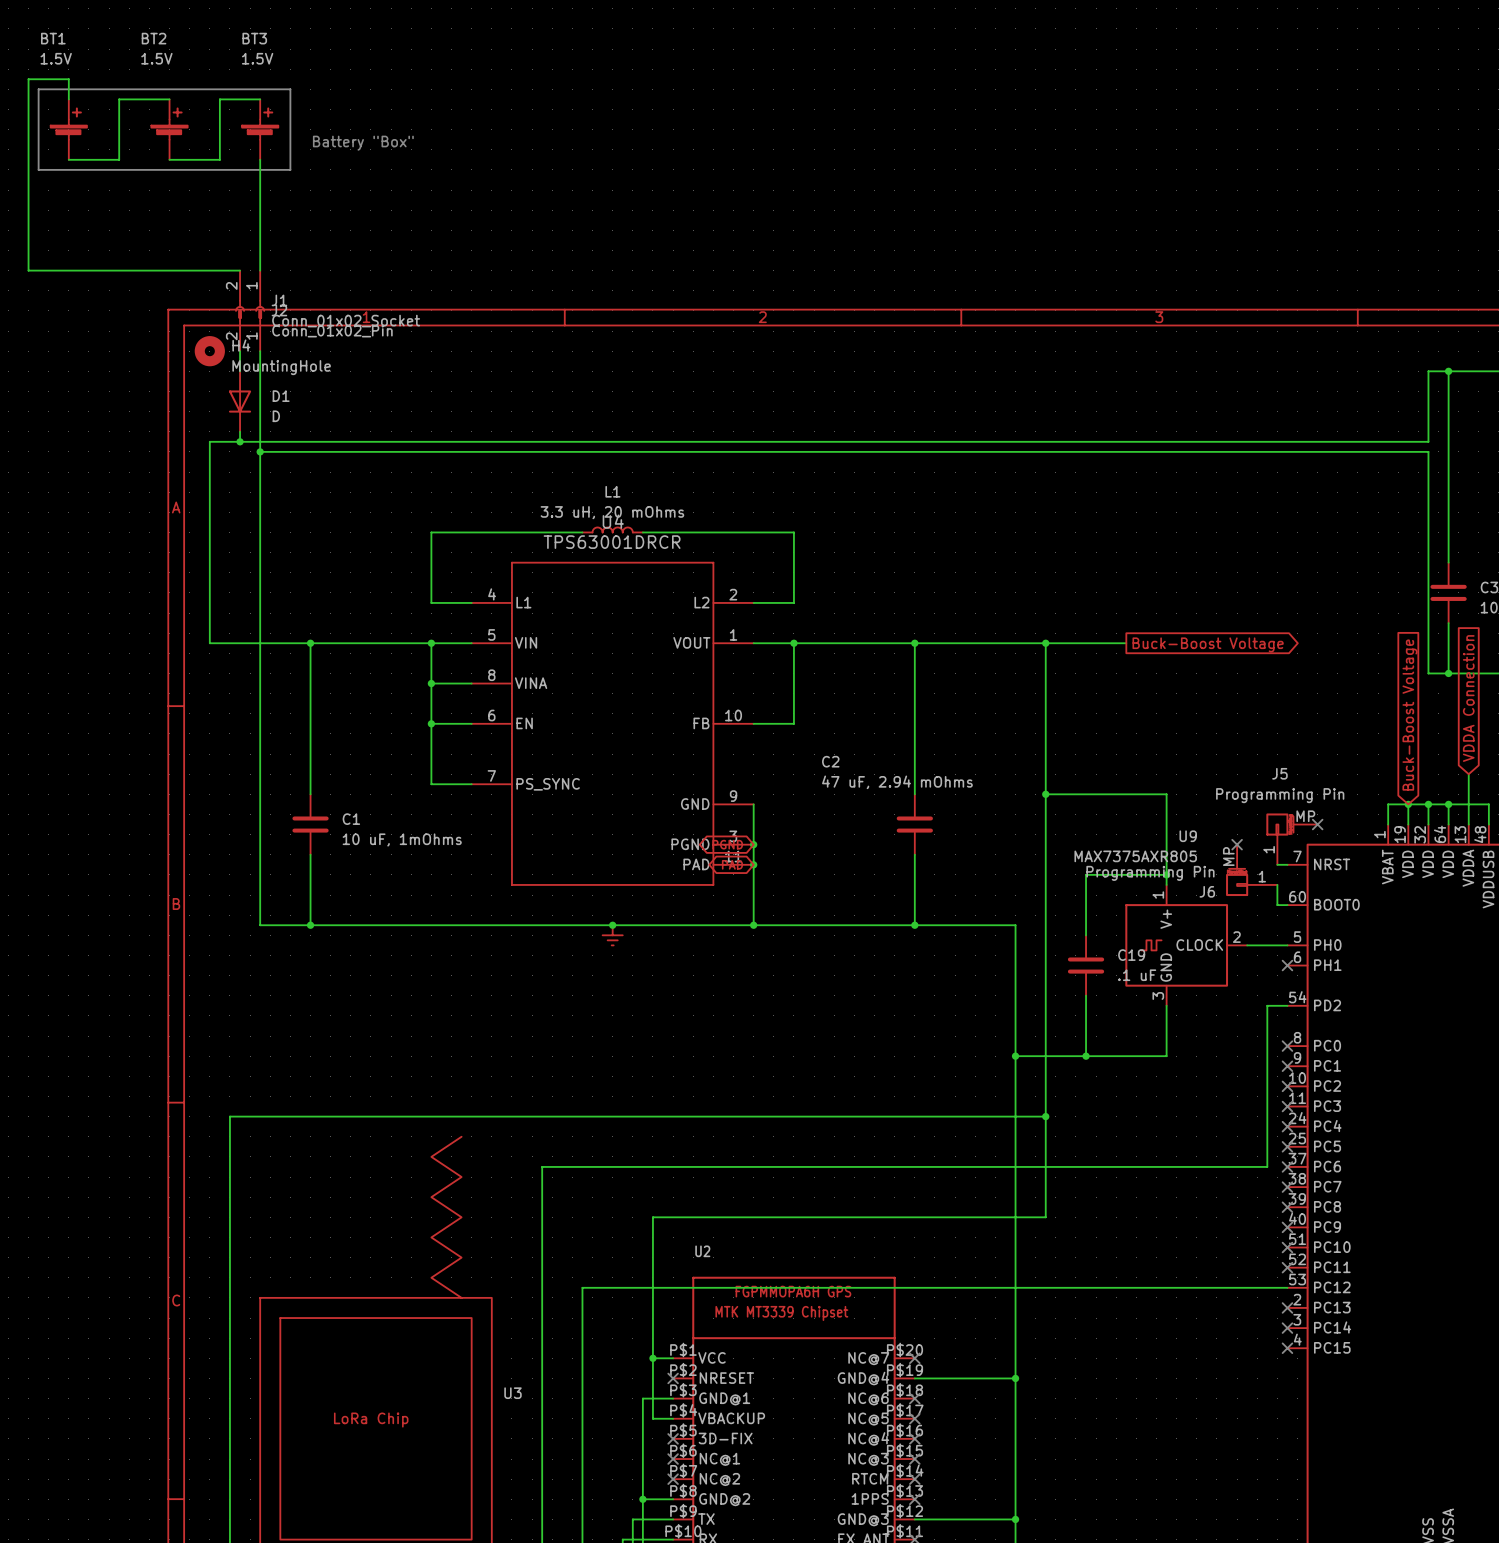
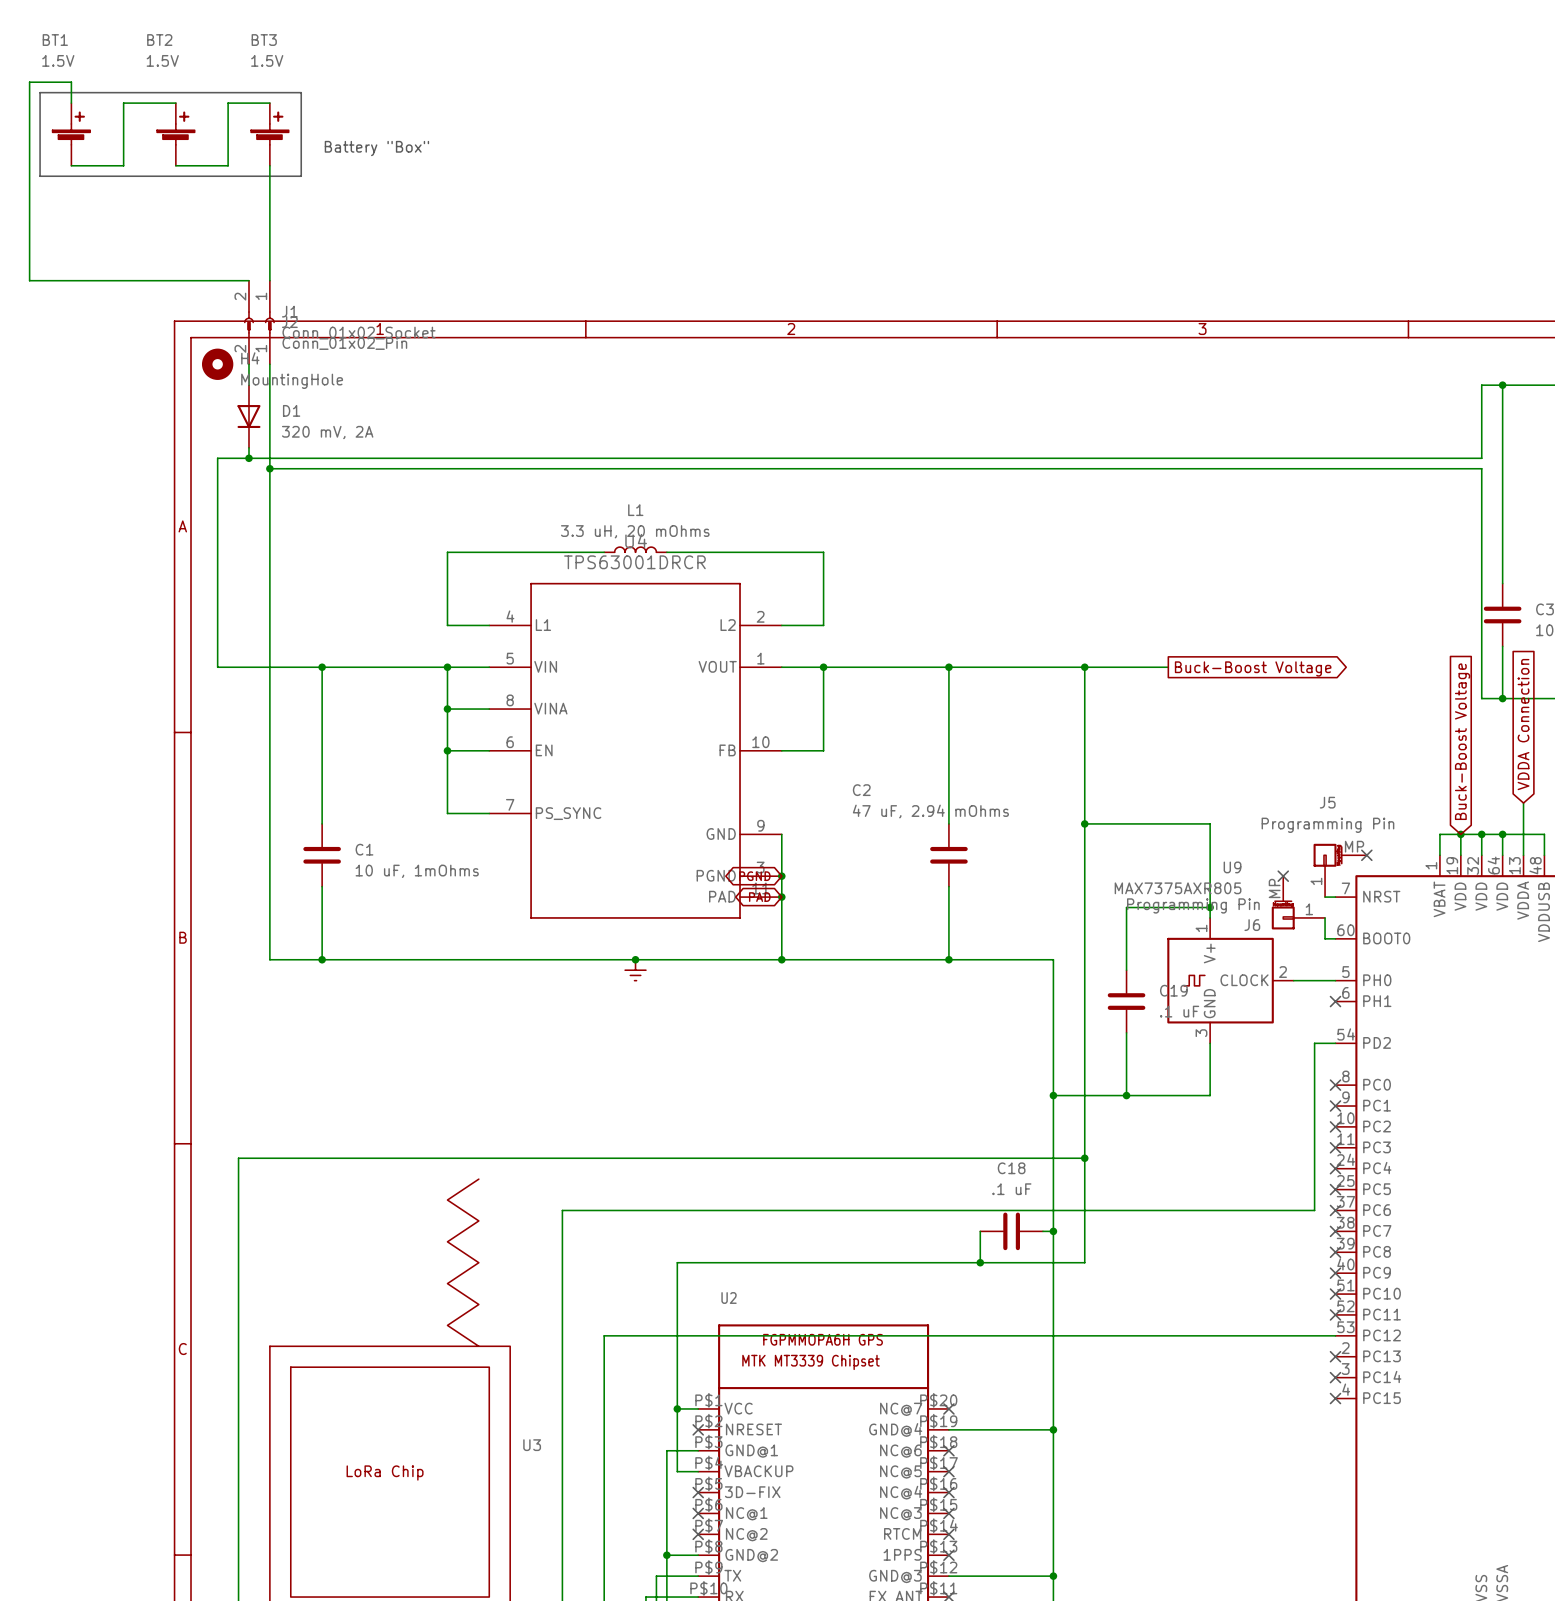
D1 value: D (276, 416) -> 320 mV, 2A (327, 432)
wire: none -> (980, 1231) (980, 1262)
C18: none -> .1 uF (1011, 1231)
wire: none -> (1042, 1231) (1053, 1231)
junction: none -> (1053, 1231)
junction: none -> (980, 1262)

